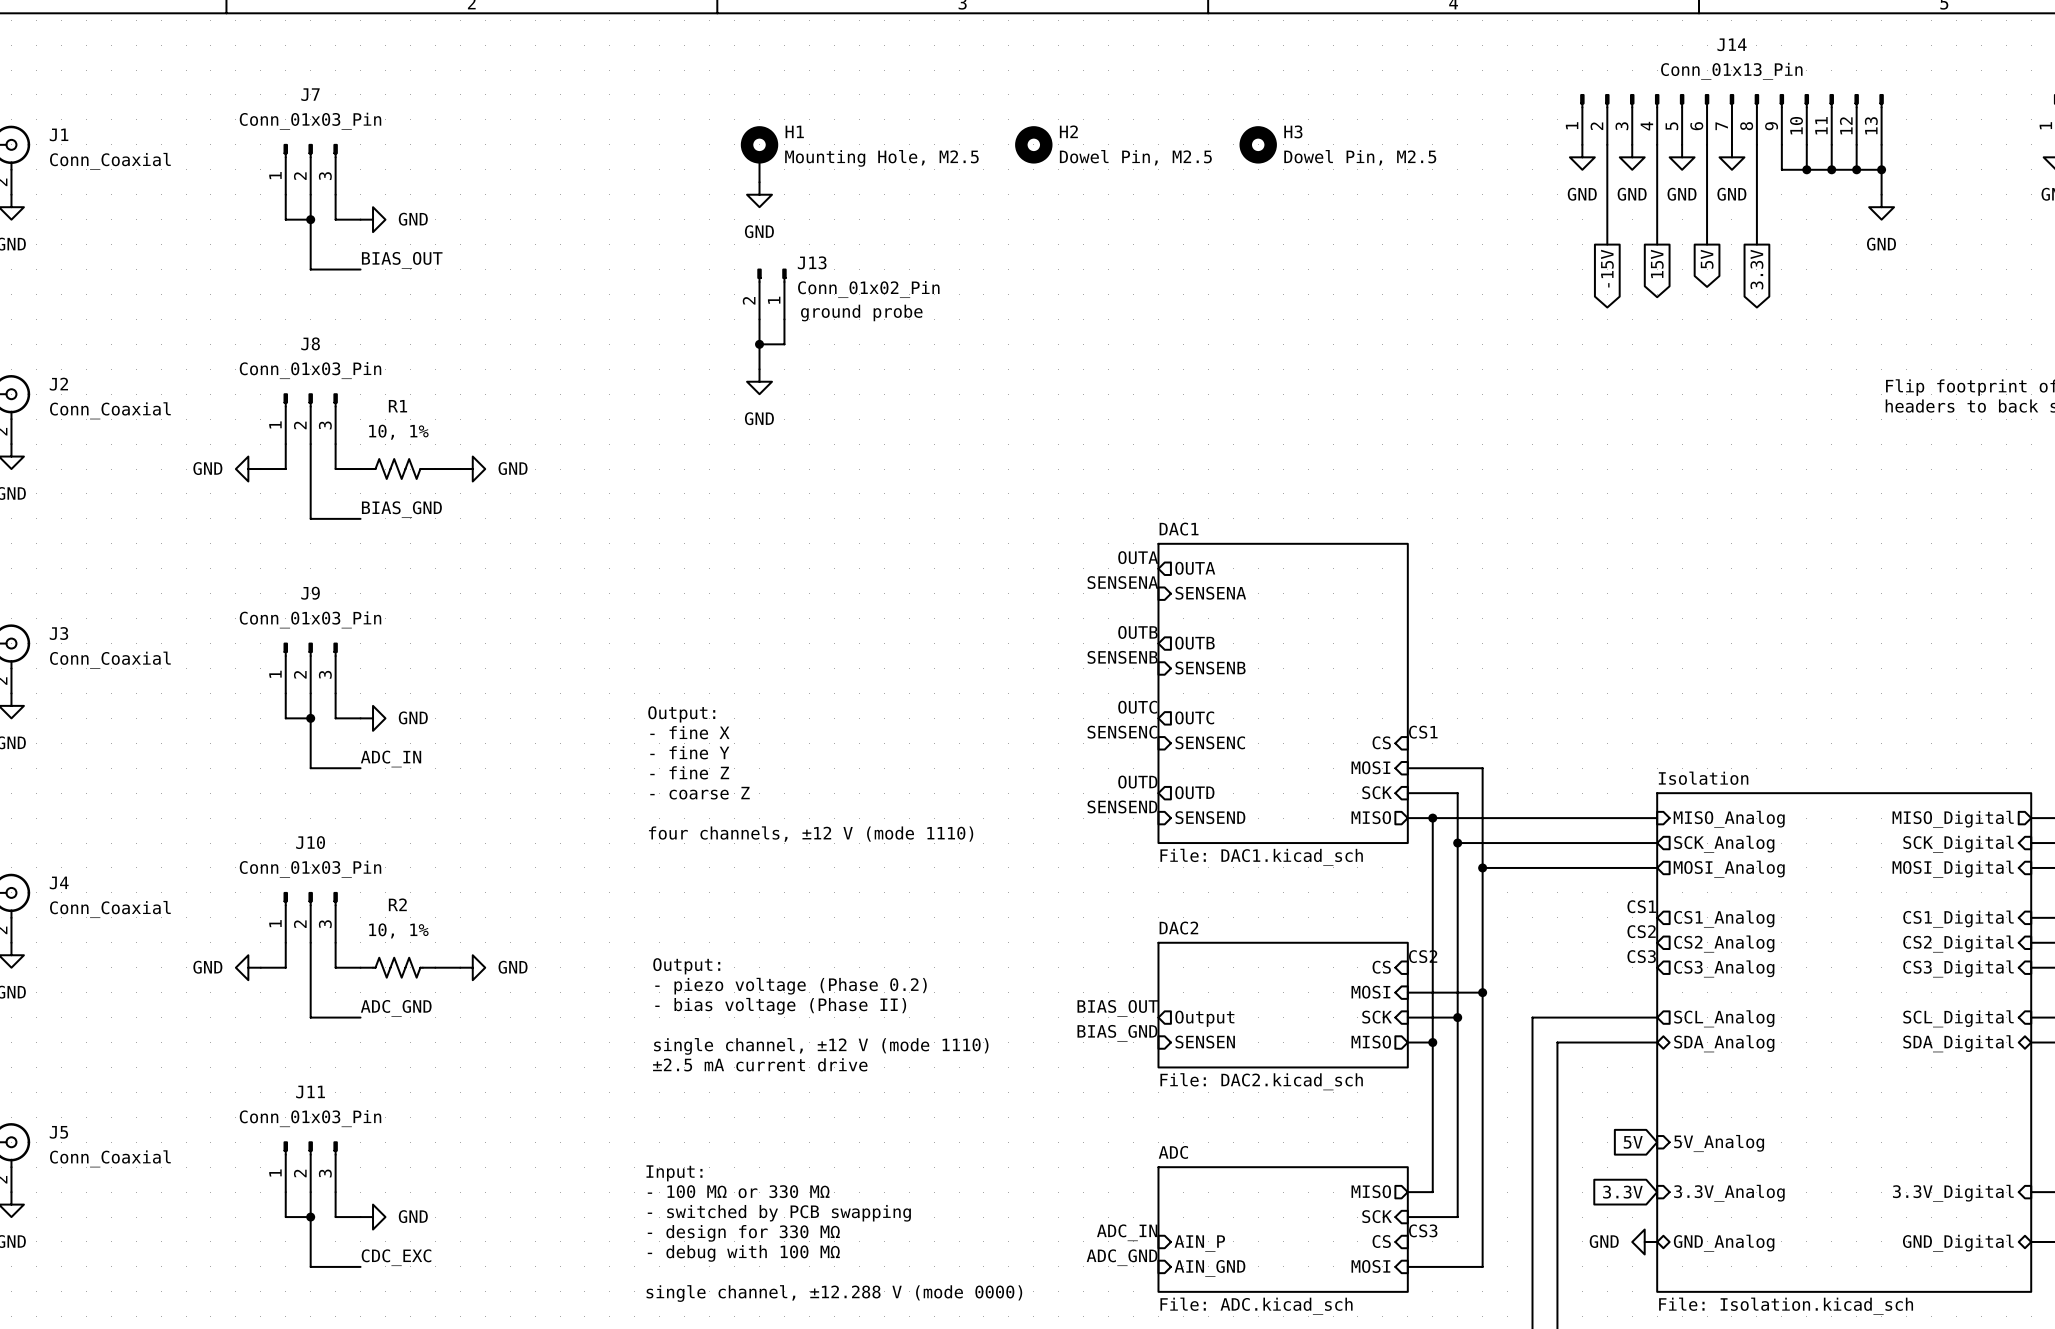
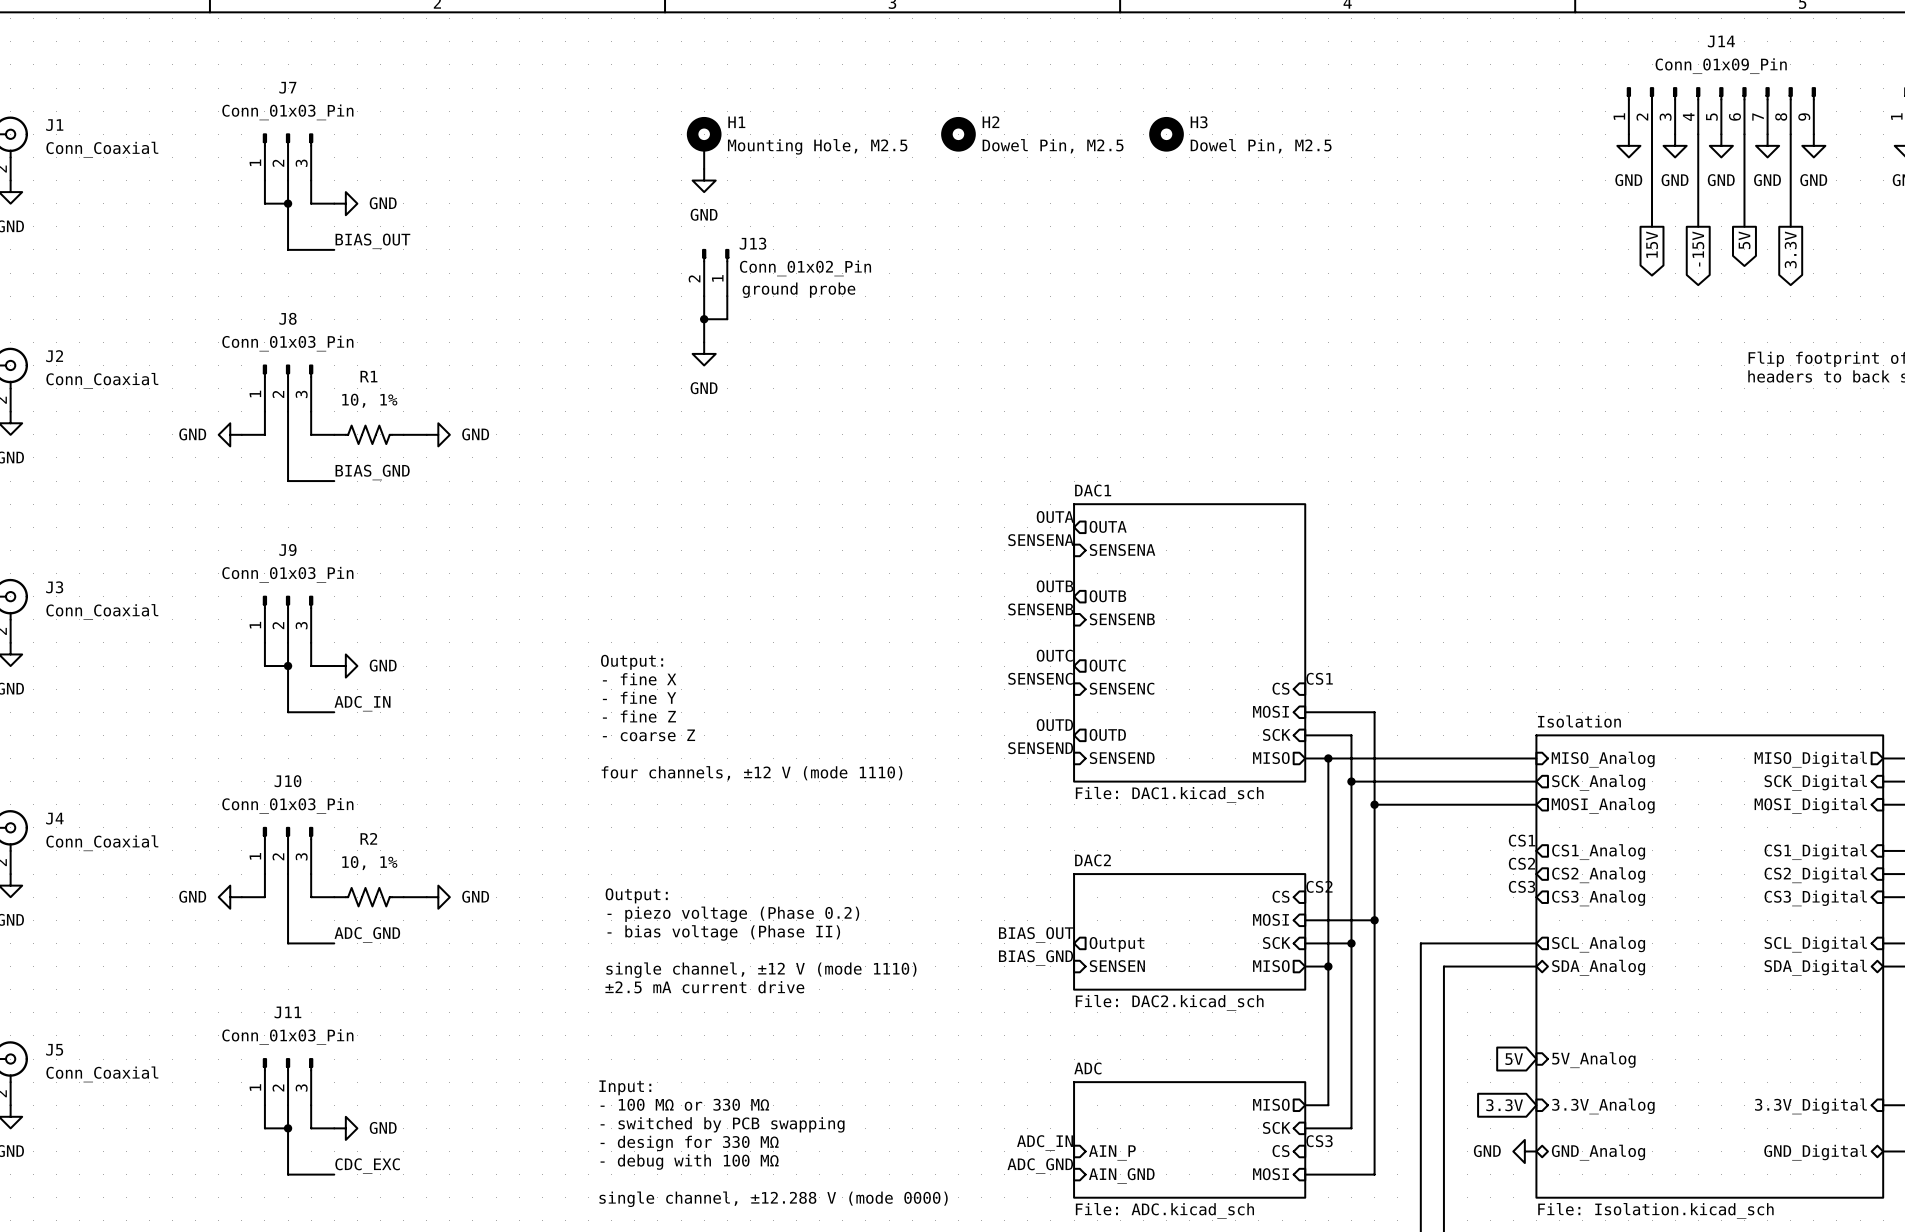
J14 value: Conn_01x13_Pin (1731, 71) -> Conn_01x09_Pin (1721, 66)
J14 symbol: [1580, 94, 1884, 145] -> [1627, 87, 1816, 135]
wire: (1607, 144) (1607, 244) -> none
wire: (1657, 144) (1657, 244) -> none
wire: (1707, 144) (1707, 244) -> none
wire: (1756, 144) (1756, 244) -> (1790, 134) (1790, 226)
power symbol: GND (1582, 157) -> none
power symbol: GND (1632, 157) -> none
power symbol: GND (1682, 157) -> none
power symbol position: GND (1731, 157) -> GND (1628, 145)
power symbol: none -> GND (1675, 145)
power symbol: none -> GND (1721, 145)
power symbol: none -> GND (1767, 145)
power symbol: none -> GND (1813, 145)
wire: (1781, 169) (1881, 169) -> (1652, 157) (1652, 226)
junction: (1806, 169) -> none
wire: none -> (1698, 157) (1698, 226)
junction: (1831, 169) -> none
junction: (1856, 169) -> none
junction: (1881, 169) -> none
wire: none -> (1744, 180) (1744, 226)
power symbol: GND (1881, 207) -> none
global label position: 5V (1707, 259) -> 5V (1744, 240)
global label position: 15V (1657, 263) -> 15V (1652, 244)
global label position: -15V (1607, 268) -> -15V (1698, 249)
global label position: 3.3V (1756, 269) -> 3.3V (1790, 249)

